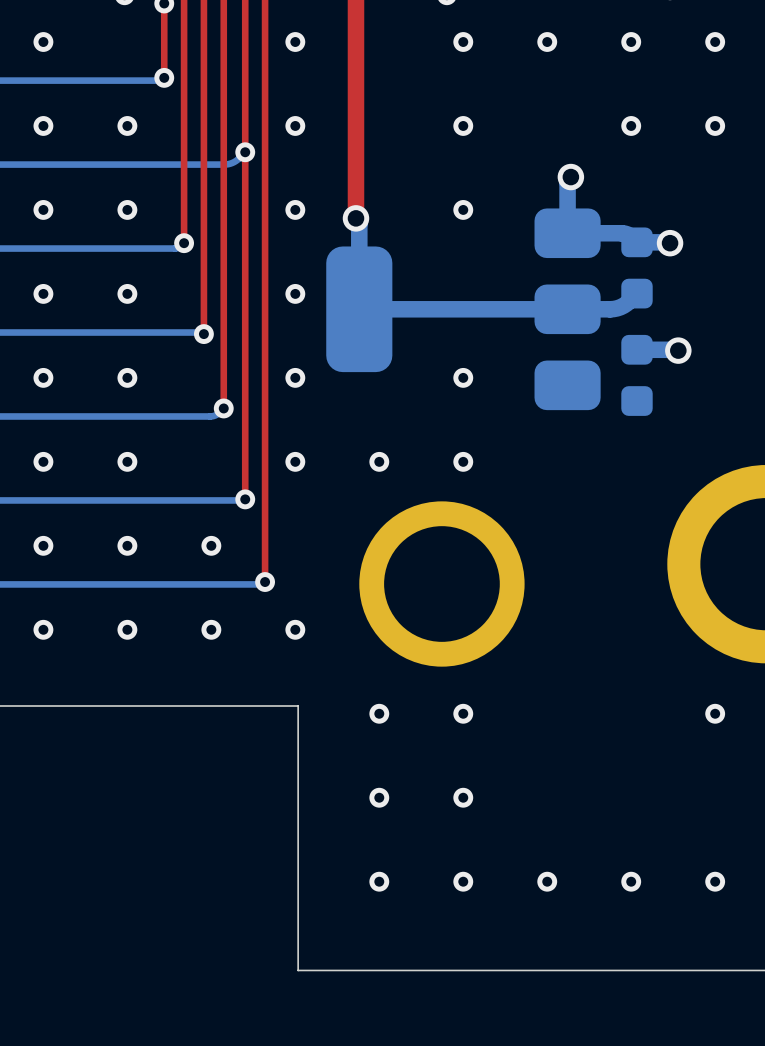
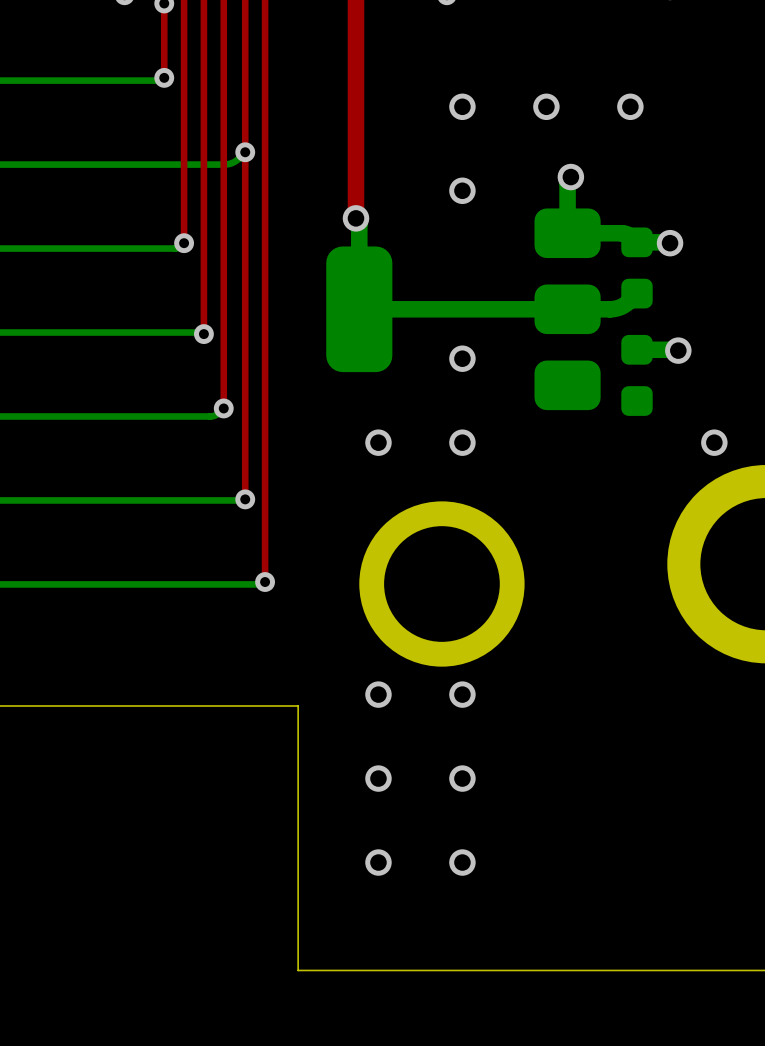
via: (43, 42) -> none
via: (295, 42) -> none
via: (463, 42) -> none
via: (547, 42) -> none
via: (631, 42) -> none
via: (715, 42) -> none
via: none -> (546, 106)
via: (43, 125) -> none
via: (127, 125) -> none
via: (295, 125) -> none
via position: (463, 125) -> (462, 106)
via position: (631, 125) -> (630, 106)
via: (715, 125) -> none
via: (43, 209) -> none
via: (127, 209) -> none
via: (295, 209) -> none
via position: (463, 209) -> (462, 190)
via: (43, 293) -> none
via: (127, 293) -> none
via: (295, 293) -> none
via: (43, 377) -> none
via: (127, 377) -> none
via: (295, 377) -> none
via position: (463, 377) -> (462, 358)
via: none -> (714, 442)
via: (43, 461) -> none
via: (127, 461) -> none
via: (295, 461) -> none
via position: (379, 461) -> (378, 442)
via position: (463, 461) -> (462, 442)
via: (43, 545) -> none
via: (127, 545) -> none
via: (211, 545) -> none
via: (43, 629) -> none
via: (127, 629) -> none
via: (211, 629) -> none
via: (295, 629) -> none
via position: (379, 713) -> (378, 694)
via position: (463, 713) -> (462, 694)
via: (715, 713) -> none
via position: (379, 797) -> (378, 778)
via position: (463, 797) -> (462, 778)
via position: (379, 881) -> (378, 862)
via position: (463, 881) -> (462, 862)
via: (547, 881) -> none
via: (631, 881) -> none
via: (715, 881) -> none

